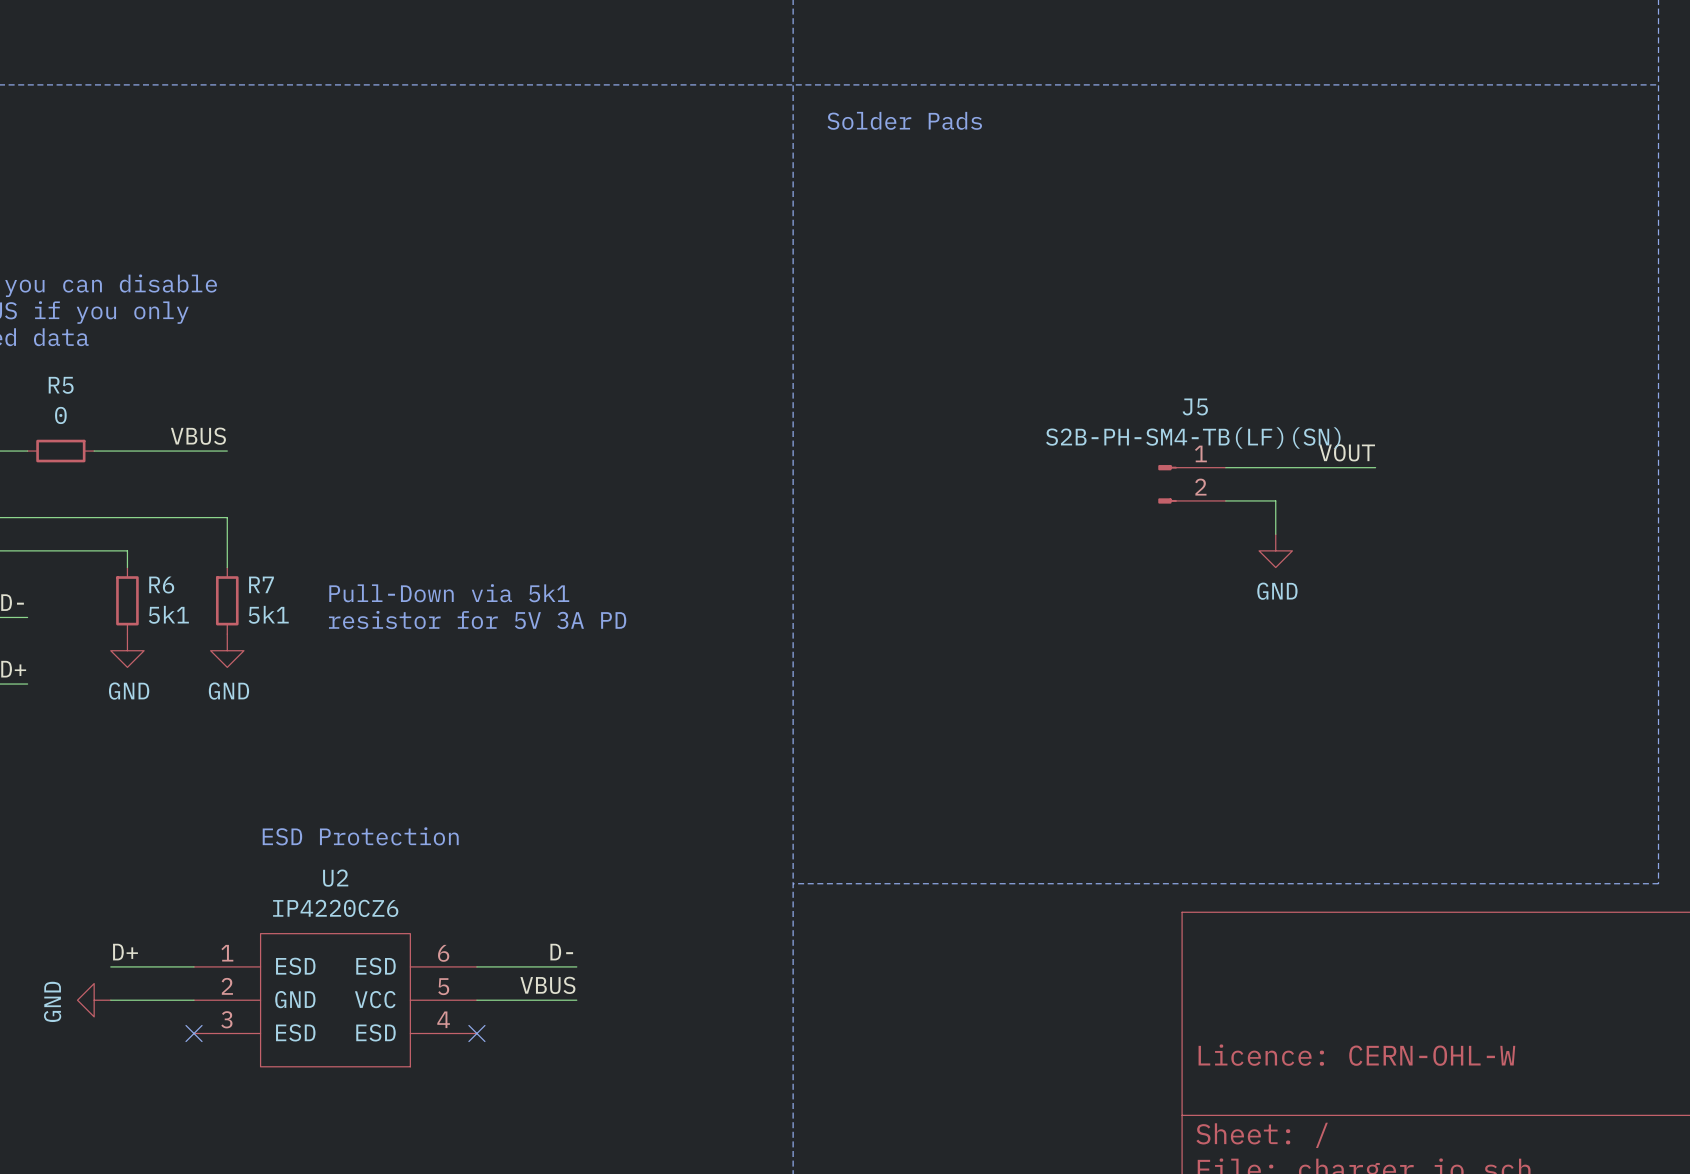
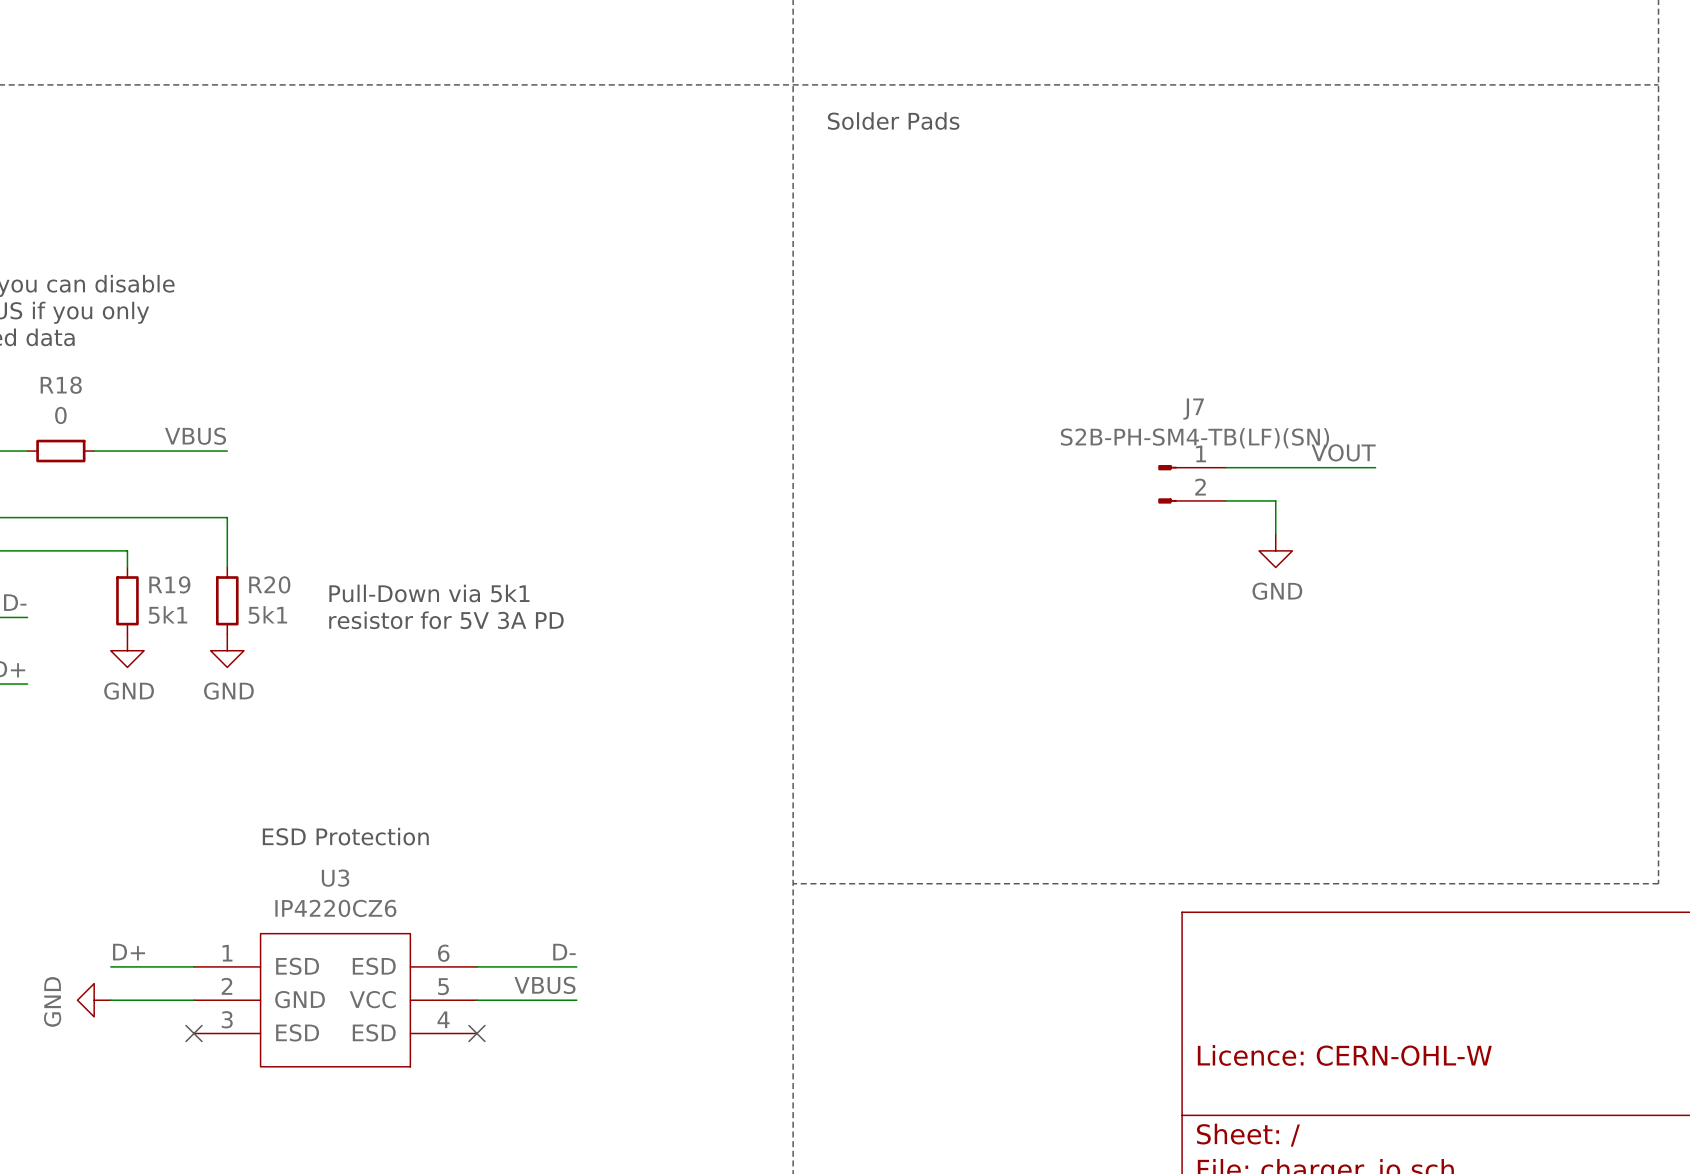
R5 name: R5 (61, 385) -> R18 (61, 385)
J5 name: J5 (1195, 406) -> J7 (1193, 409)
R7 name: R7 (261, 584) -> R20 (269, 584)
R6 name: R6 (161, 585) -> R19 (169, 584)
U2 name: U2 (335, 878) -> U3 (335, 878)

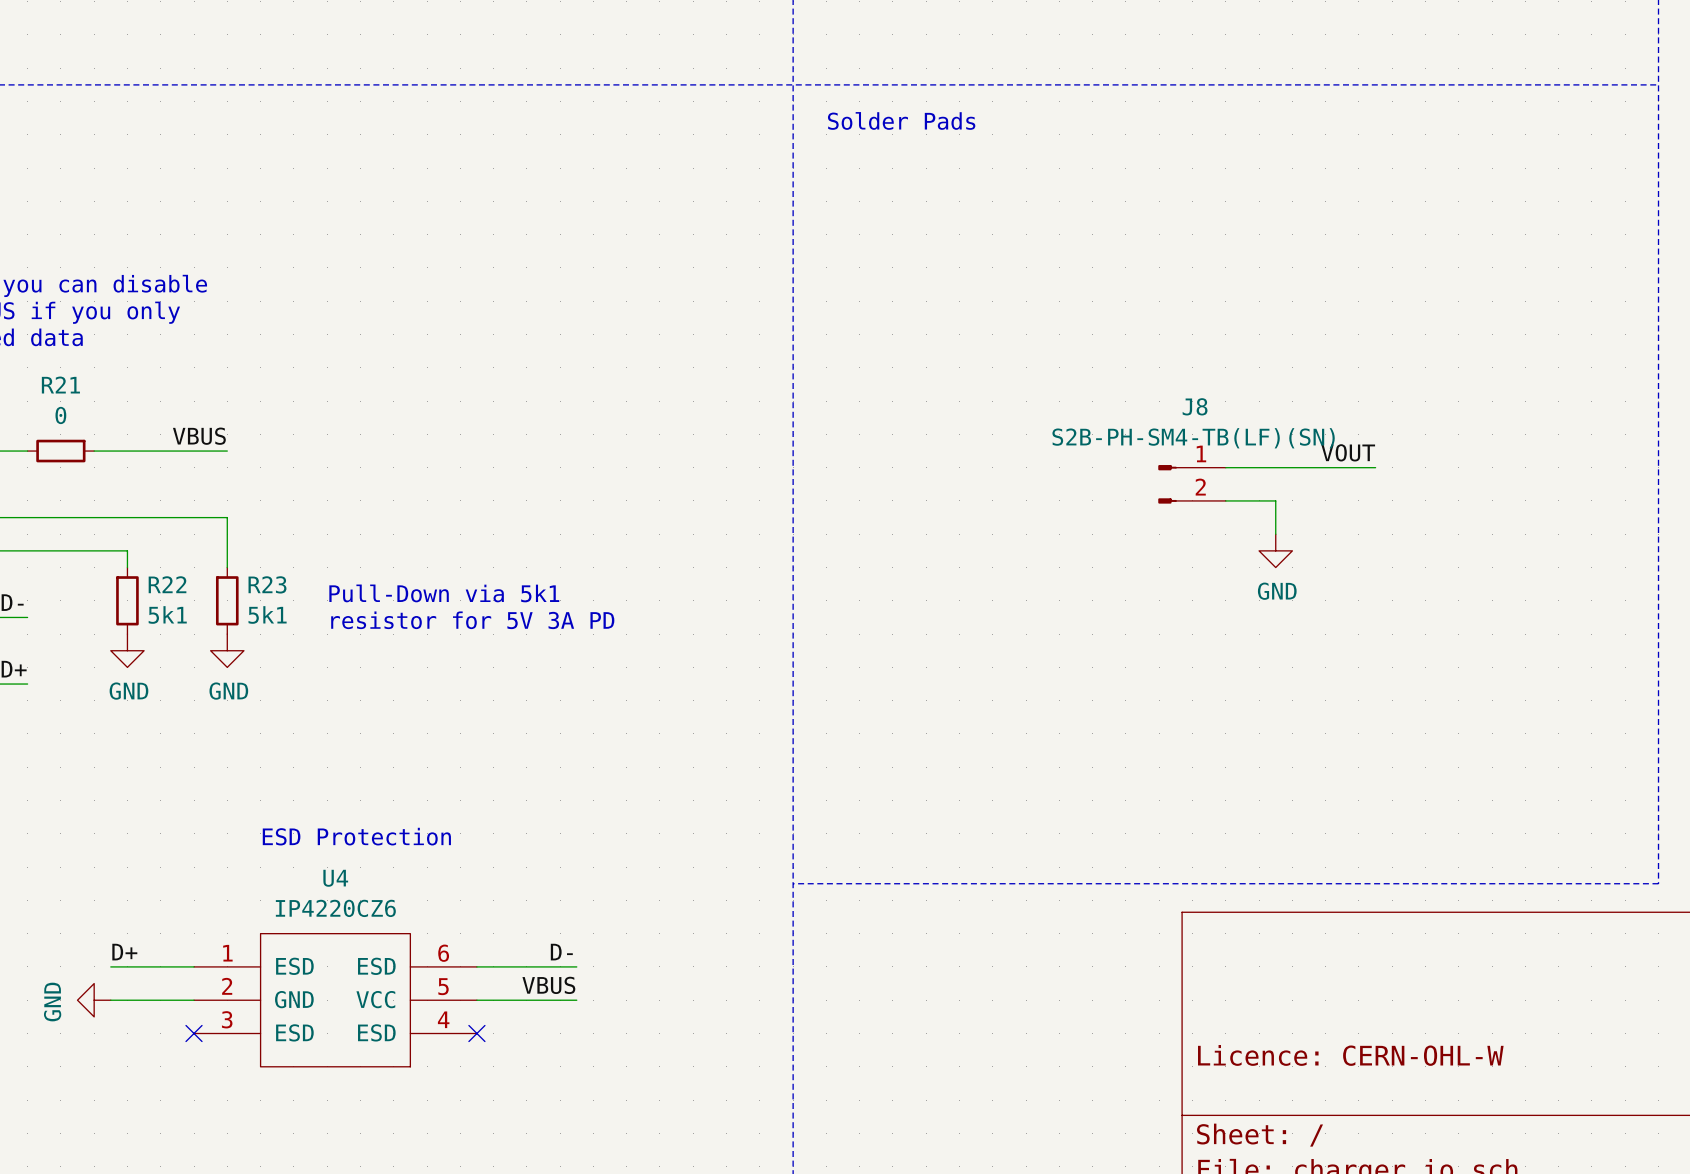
R18 name: R18 (61, 385) -> R21 (60, 385)
J7 name: J7 (1193, 409) -> J8 (1195, 406)
R19 name: R19 (169, 584) -> R22 (167, 584)
R20 name: R20 (269, 584) -> R23 (267, 584)
U3 name: U3 (335, 878) -> U4 (335, 878)

